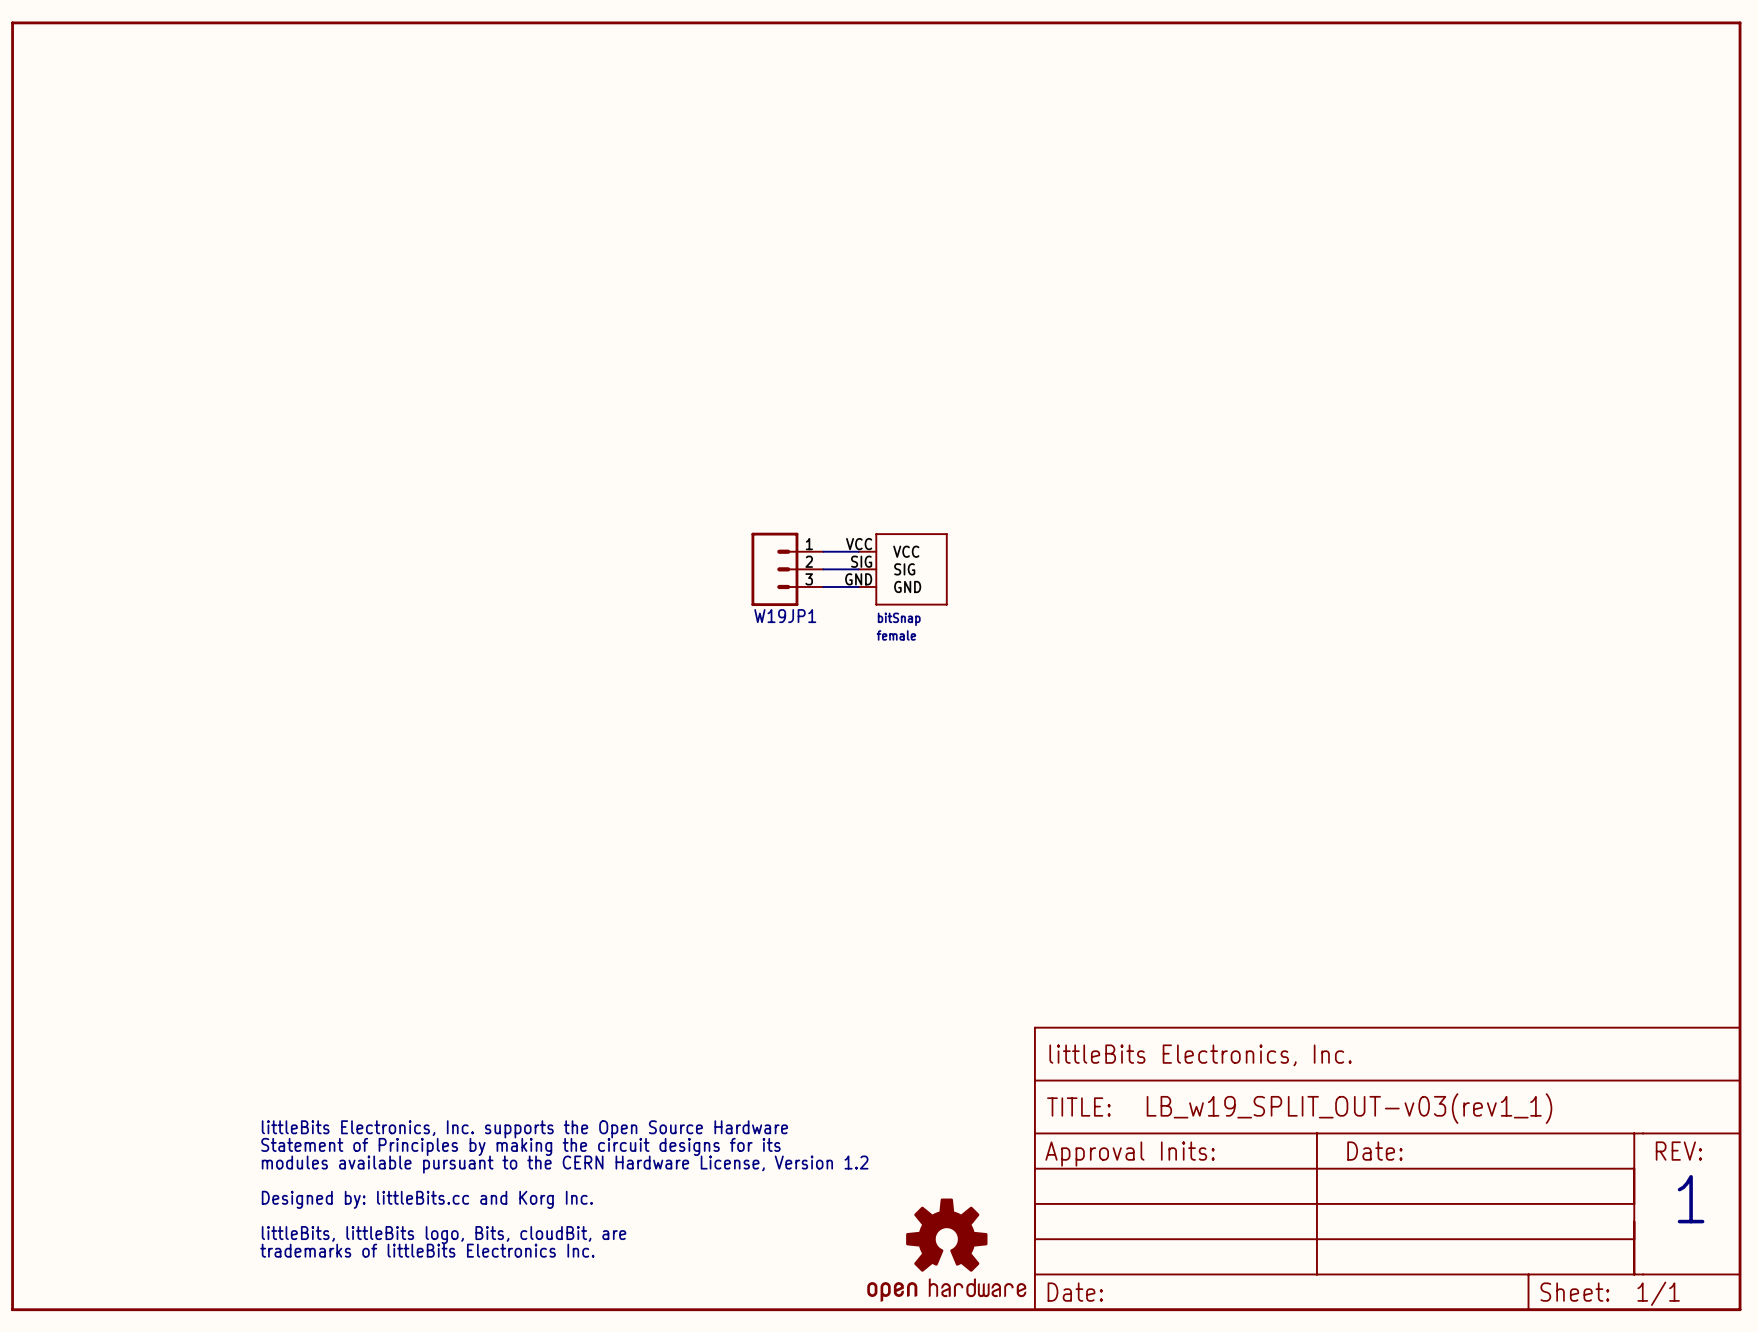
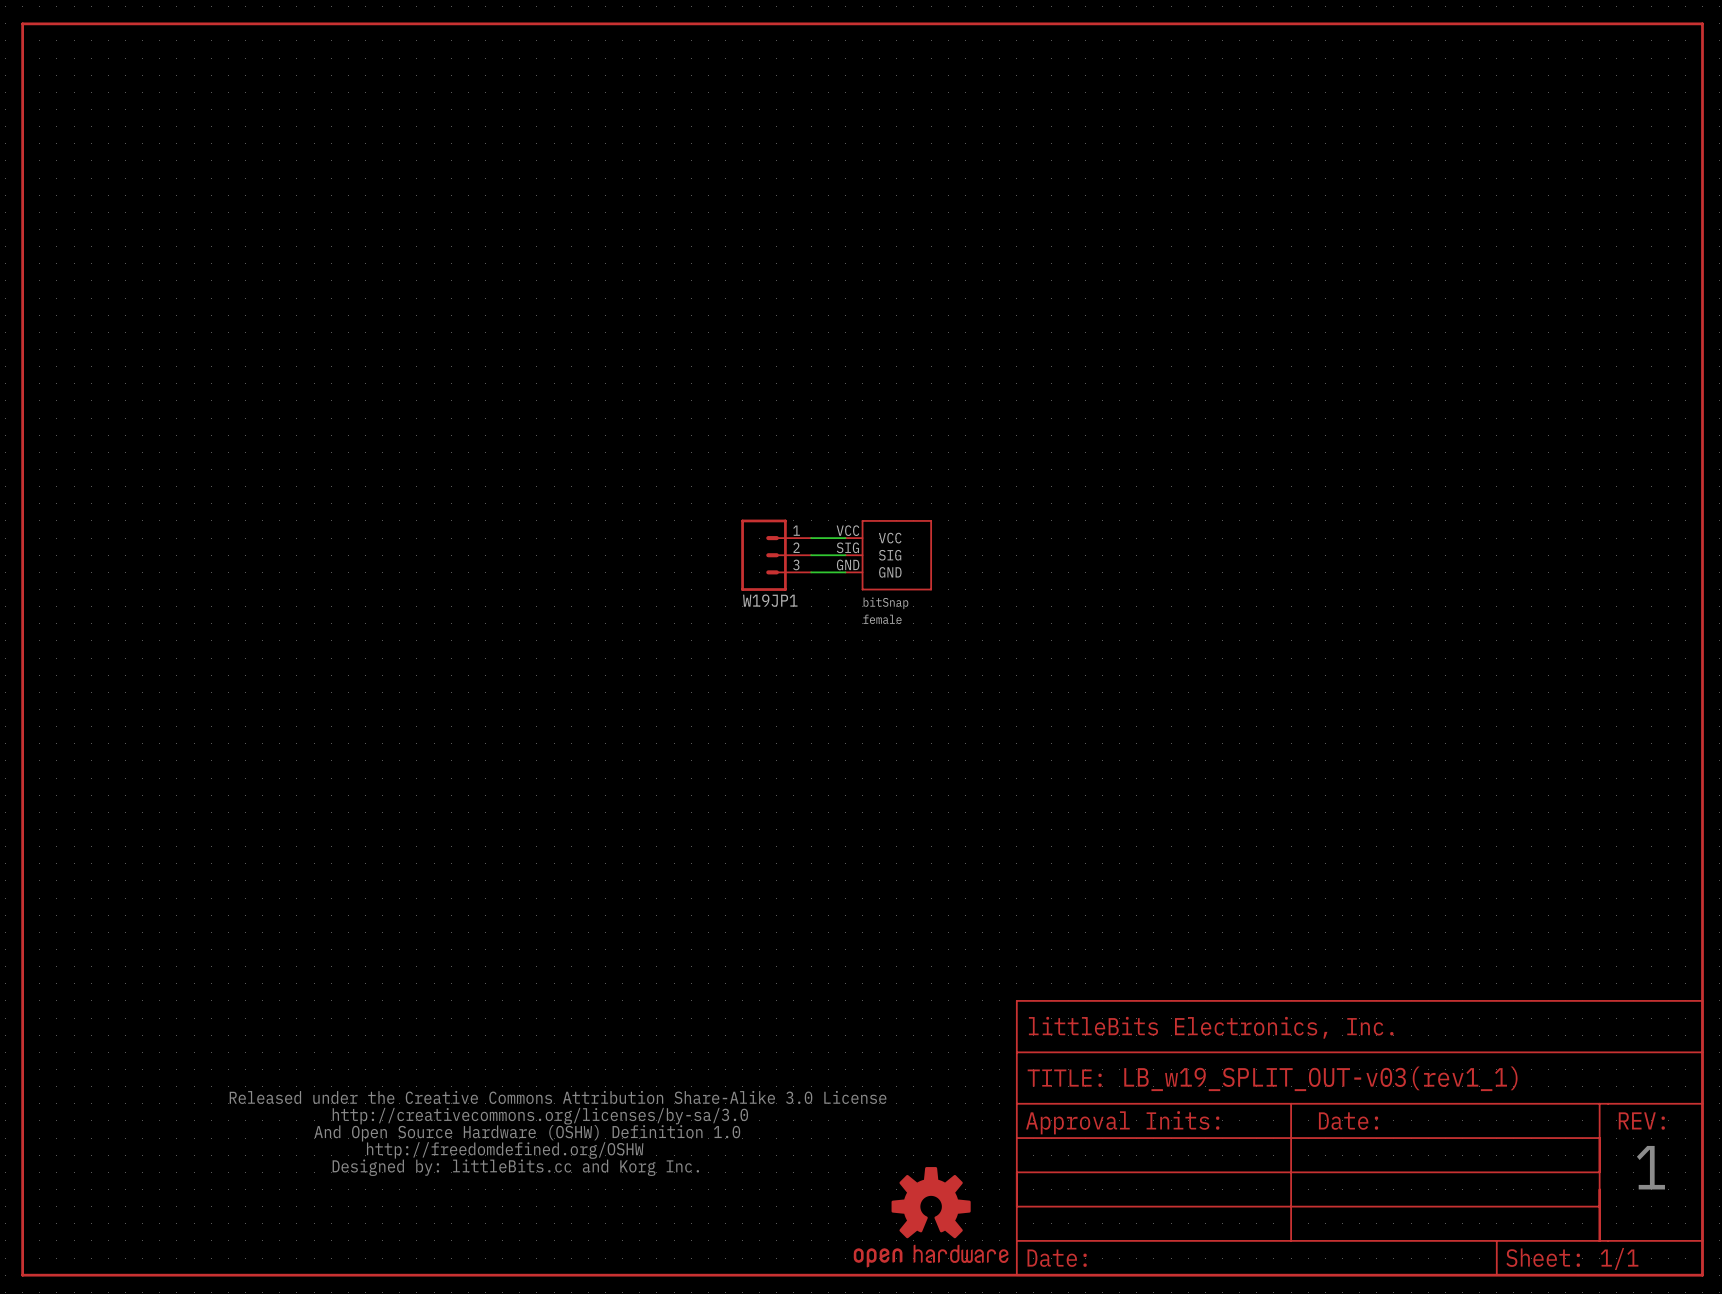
part: none -> (558, 1133)
part: (564, 1188) -> none

